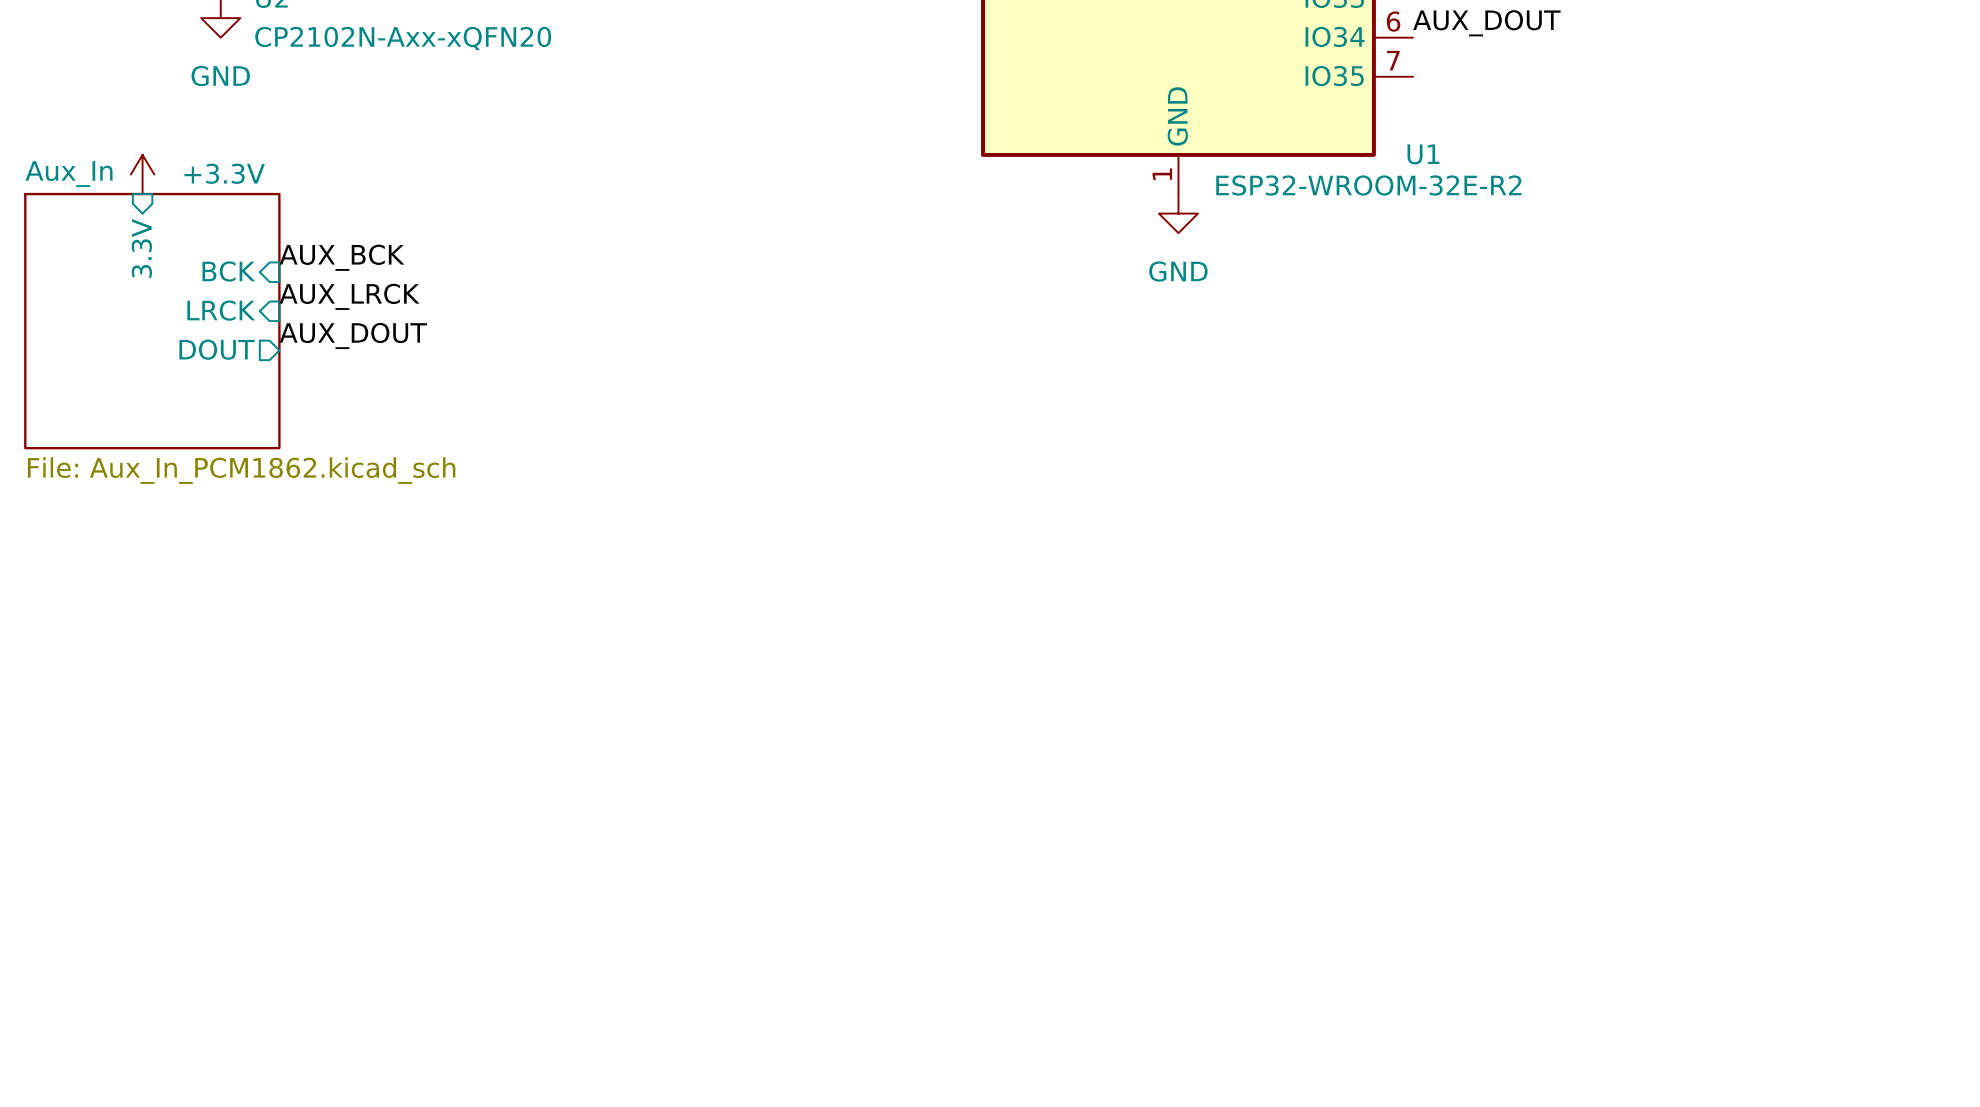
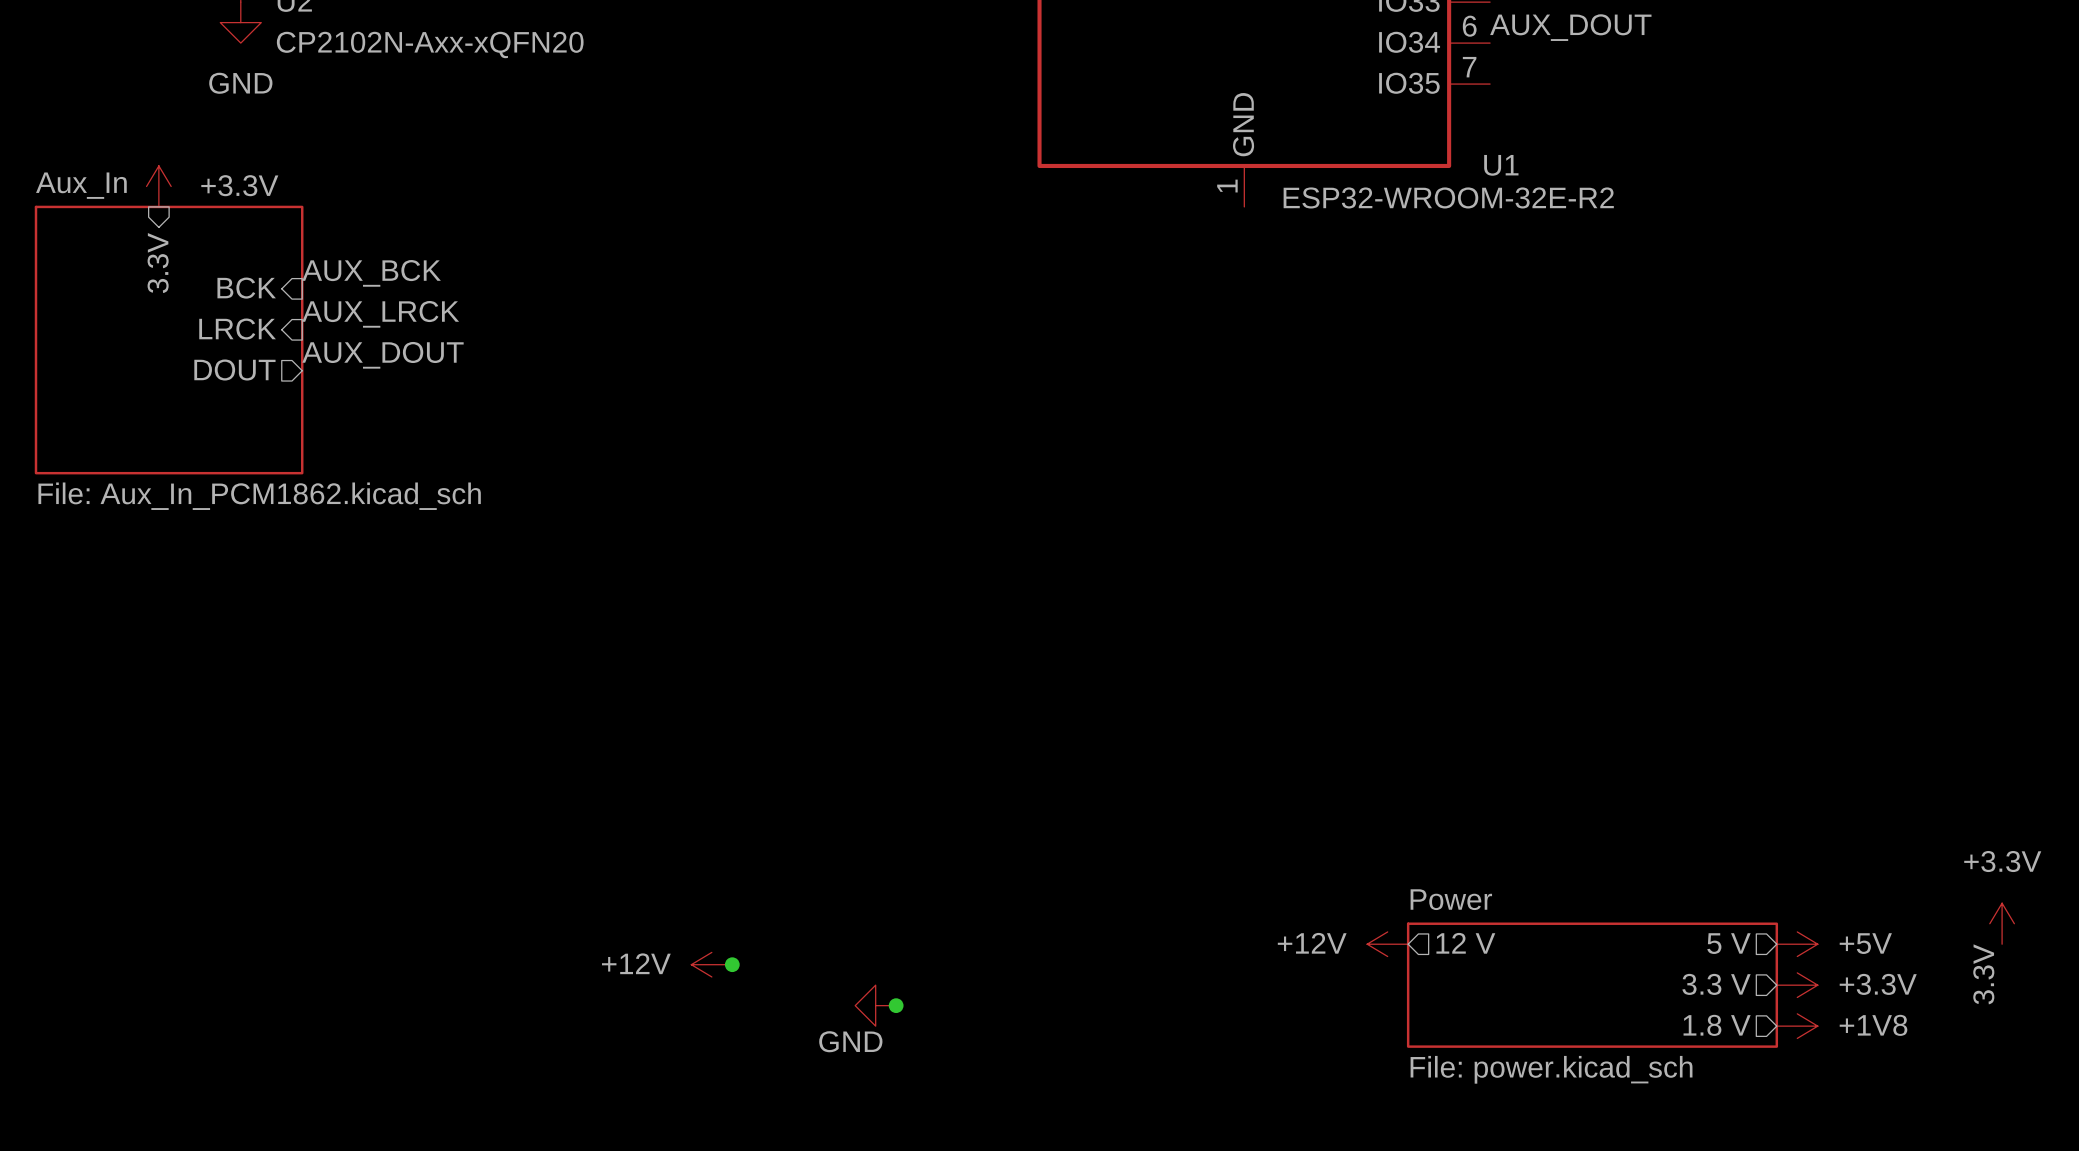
power symbol: GND (1178, 213) -> none
power symbol: none -> +3.3V (2002, 923)
sheet pin: none -> 12 V (1465, 943)
power symbol: none -> +12V (1387, 944)
sheet pin: none -> 5 V (1728, 943)
power symbol: none -> +5V (1797, 944)
power symbol: none -> +12V (711, 964)
junction: none -> (732, 964)
label: none -> 3.3V (1983, 974)
sheet Power: none -> File: power.kicad_sch (1592, 985)
sheet pin: none -> 3.3 V (1716, 984)
power symbol: none -> +3.3V (1797, 985)
power symbol: none -> GND (875, 1005)
junction: none -> (896, 1005)
sheet pin: none -> 1.8 V (1717, 1025)
power symbol: none -> +1V8 (1797, 1026)

